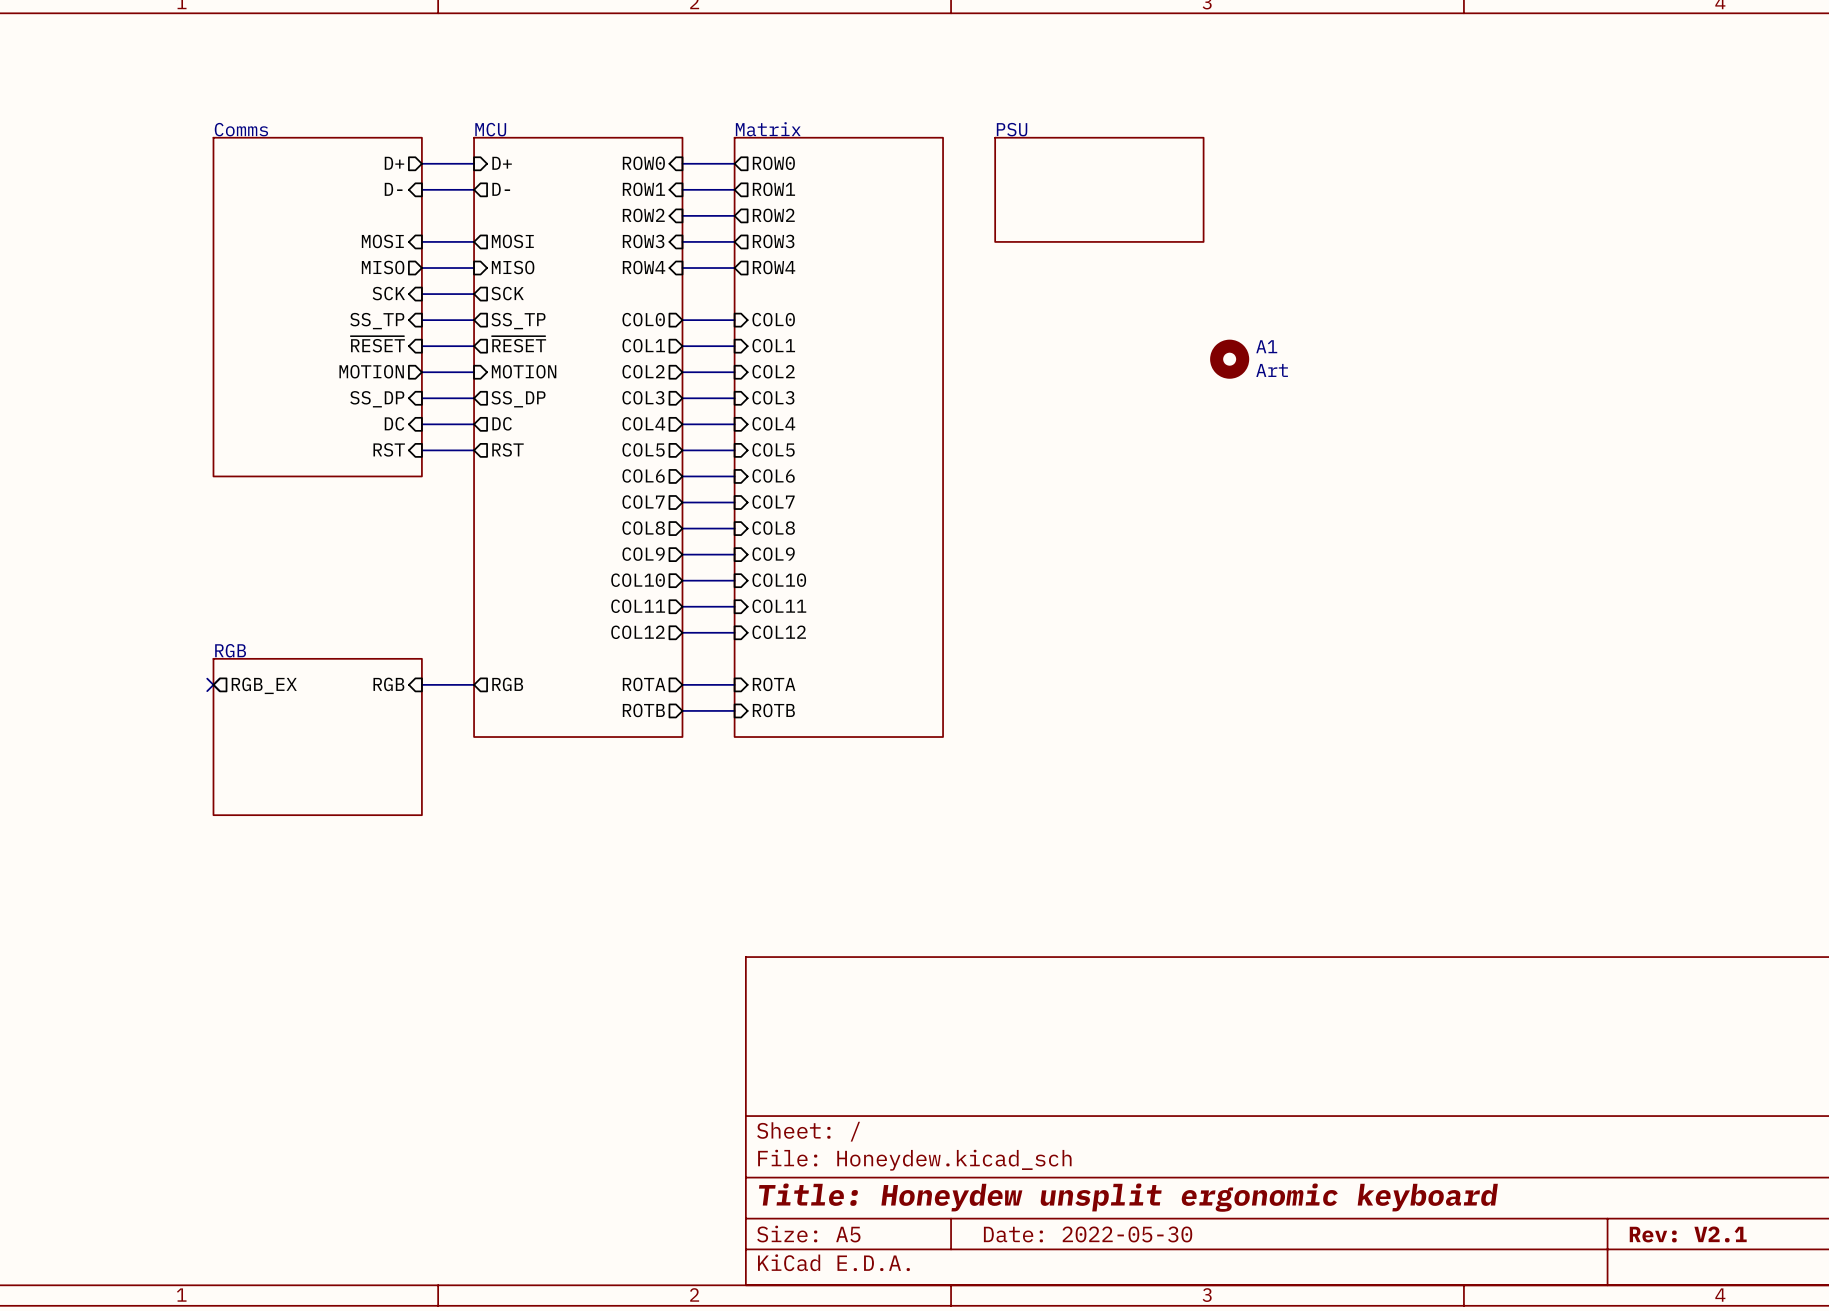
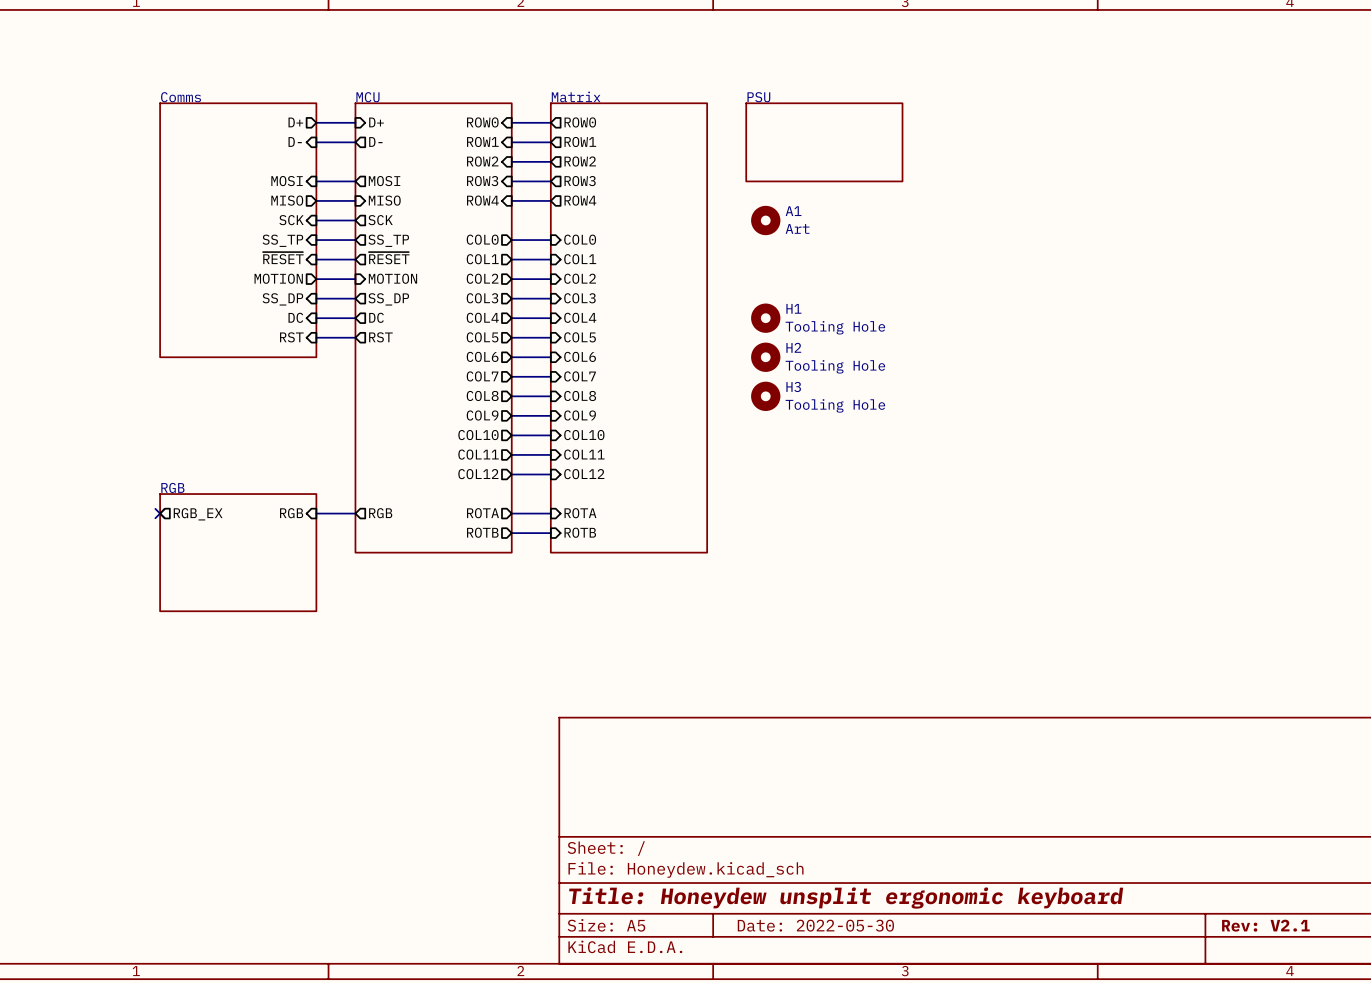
A1 position: (1229, 359) -> (765, 220)
H1: none -> Tooling Hole (765, 318)
H2: none -> Tooling Hole (765, 357)
H3: none -> Tooling Hole (765, 396)

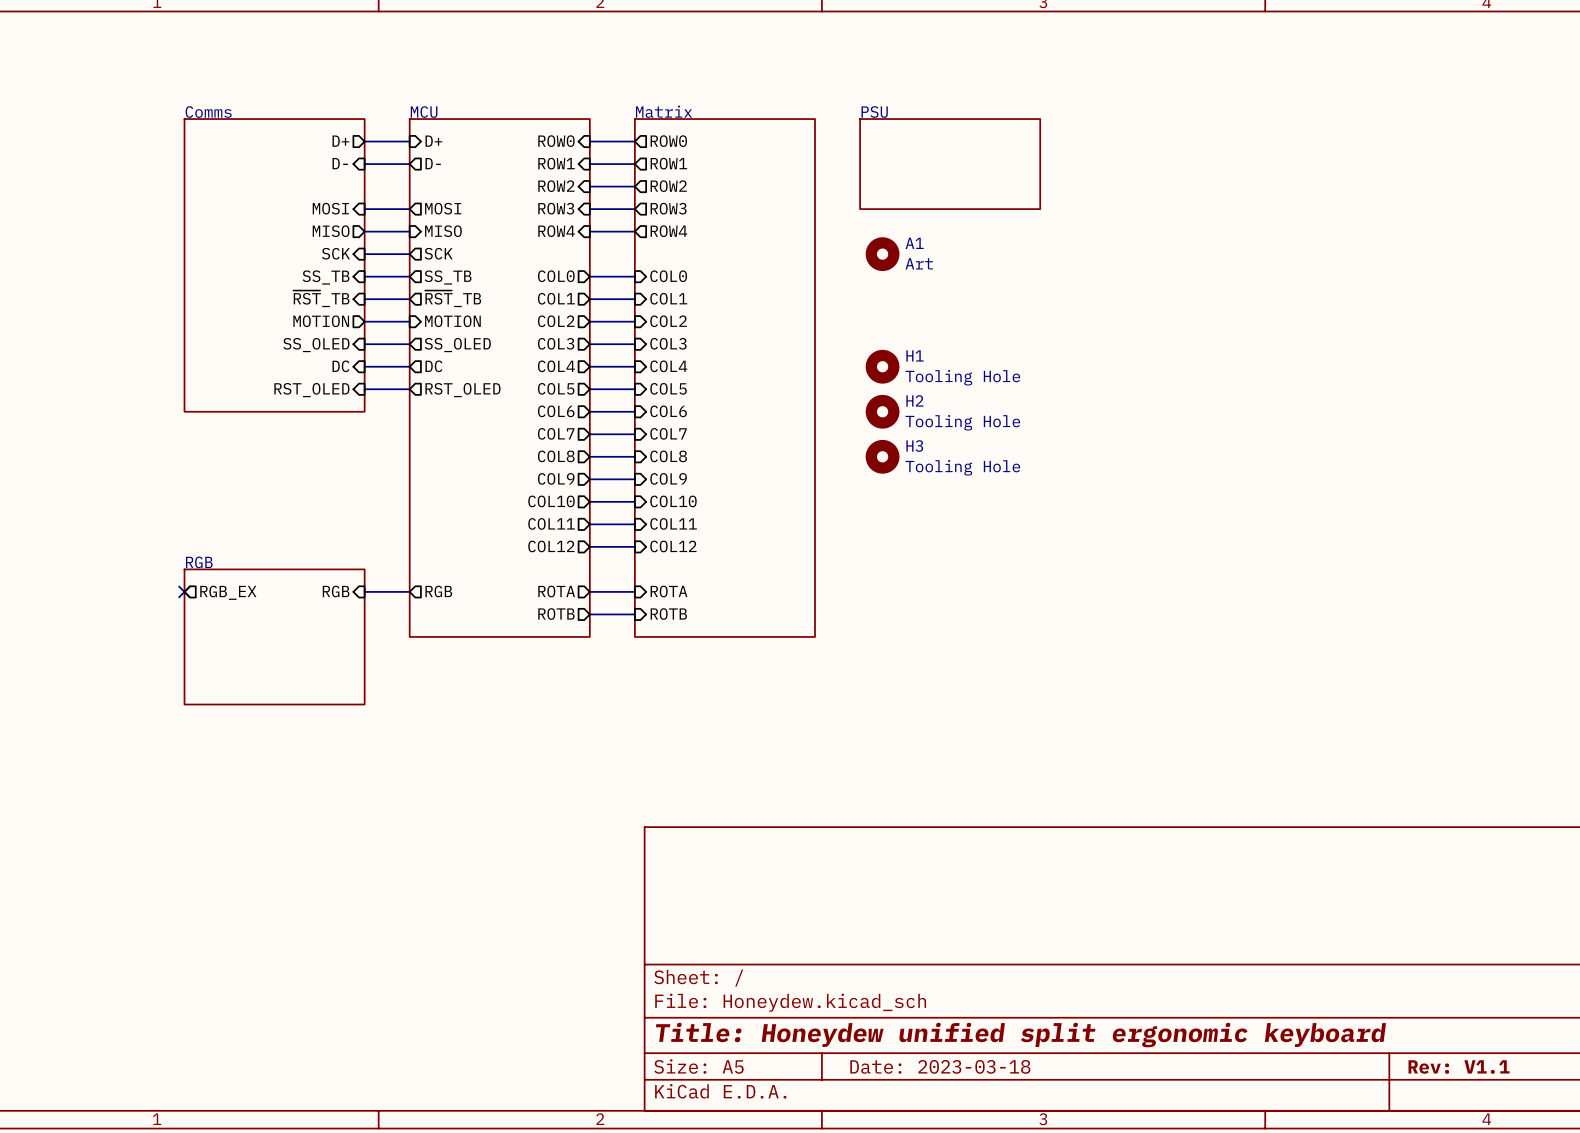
sheet pin: SS_TP (282, 240) -> SS_TB (326, 277)
sheet pin: SS_TP (388, 240) -> SS_TB (448, 277)
sheet pin: ~{RESET} (283, 258) -> ~{RST}_TB (321, 298)
sheet pin: ~{RESET} (389, 258) -> ~{RST}_TB (453, 298)
sheet pin: SS_DP (282, 299) -> SS_OLED (316, 345)
sheet pin: SS_DP (388, 299) -> SS_OLED (457, 345)
sheet pin: RST (291, 337) -> RST_OLED (311, 390)
sheet pin: RST (380, 337) -> RST_OLED (462, 390)
title block: Title: Honeydew unsplit ergonomic keyboard (846, 898) -> Title: Honeydew unified split ergonomic keyboard (1020, 1035)
title block: Date: 2022-05-30 (815, 925) -> Date: 2023-03-18 (940, 1066)
title block: Rev: V2.1 (1265, 925) -> Rev: V1.1 (1459, 1066)

